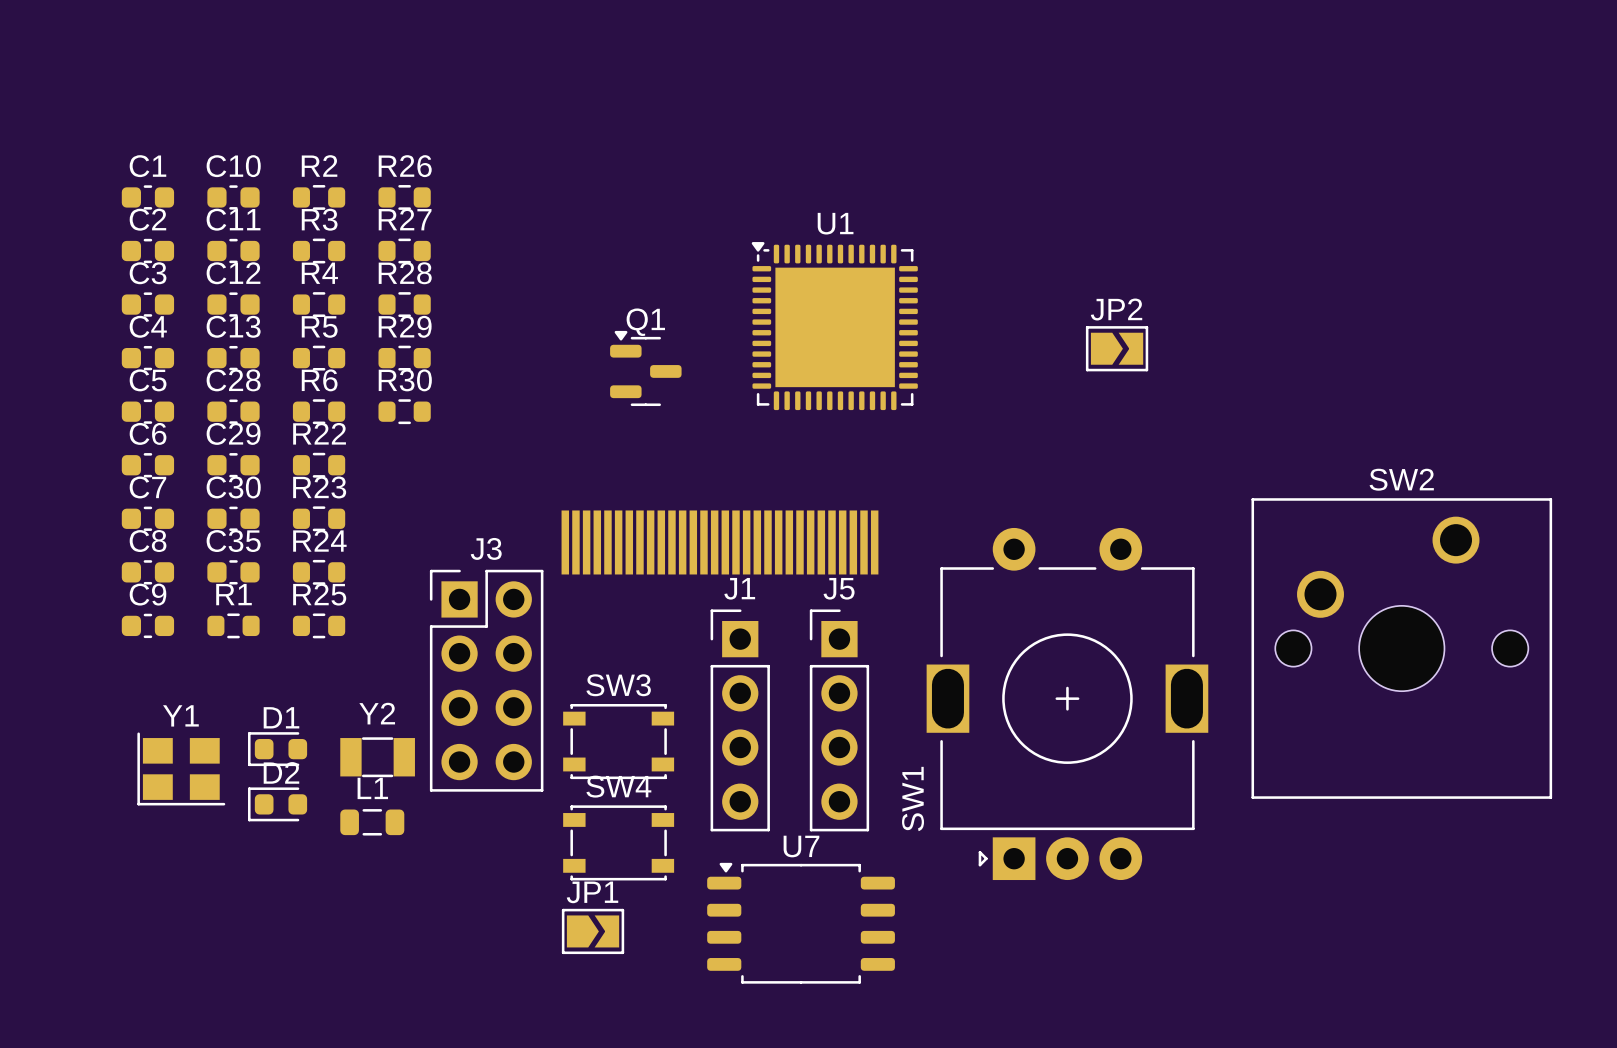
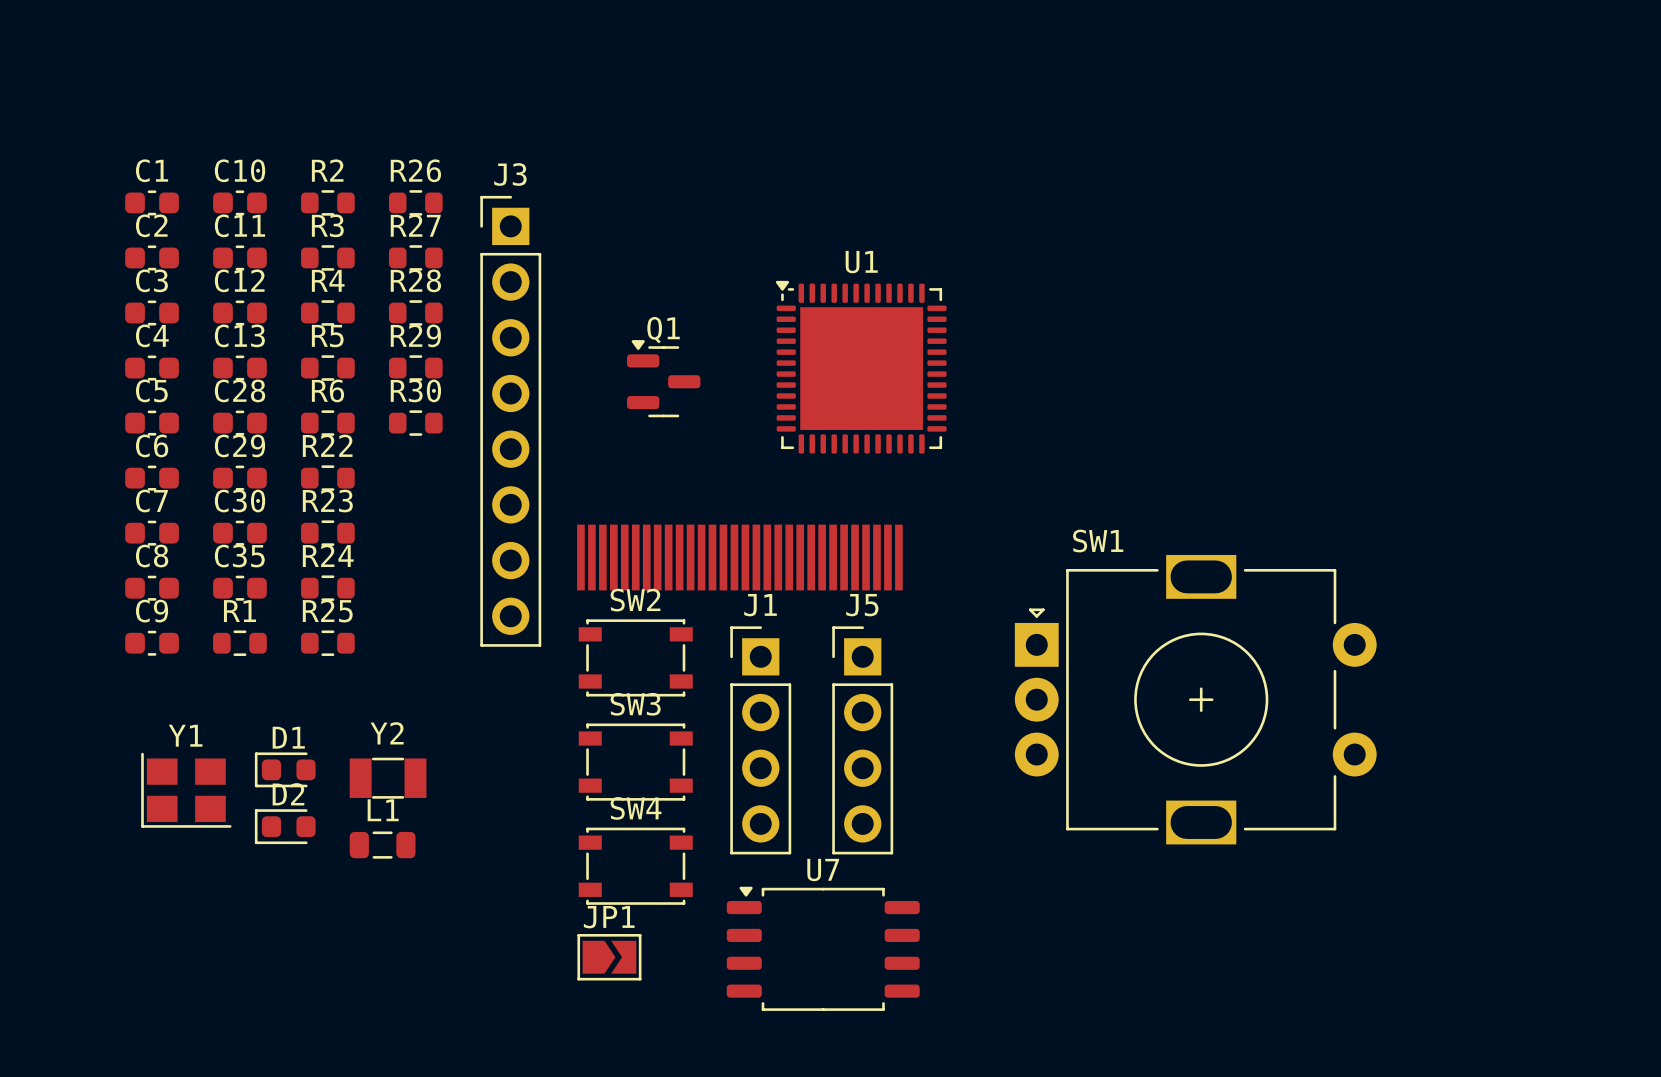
U1 position: (834, 326) -> (861, 367)
JP2: (1117, 348) -> none
SW2 name position: SW2 (1401, 479) -> SW2 (635, 600)
SW2 footprint: [1251, 498, 1553, 799] -> [578, 619, 693, 697]
J3 name position: J3 (486, 548) -> J3 (510, 174)
J3 footprint: [429, 569, 544, 792] -> [480, 195, 542, 647]
SW1 rotation: 0° (1067, 703) -> 90° clockwise (1195, 699)

